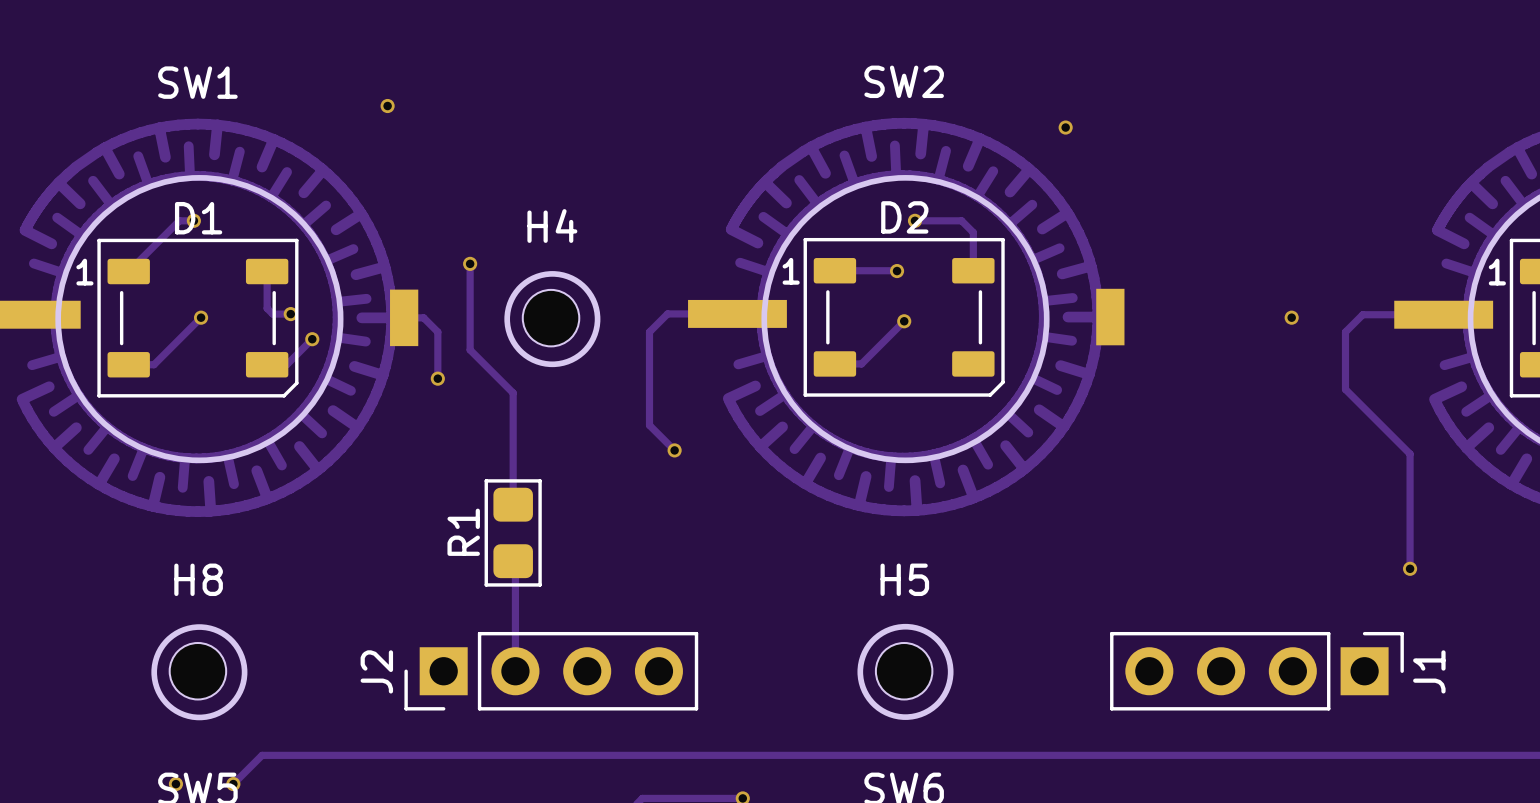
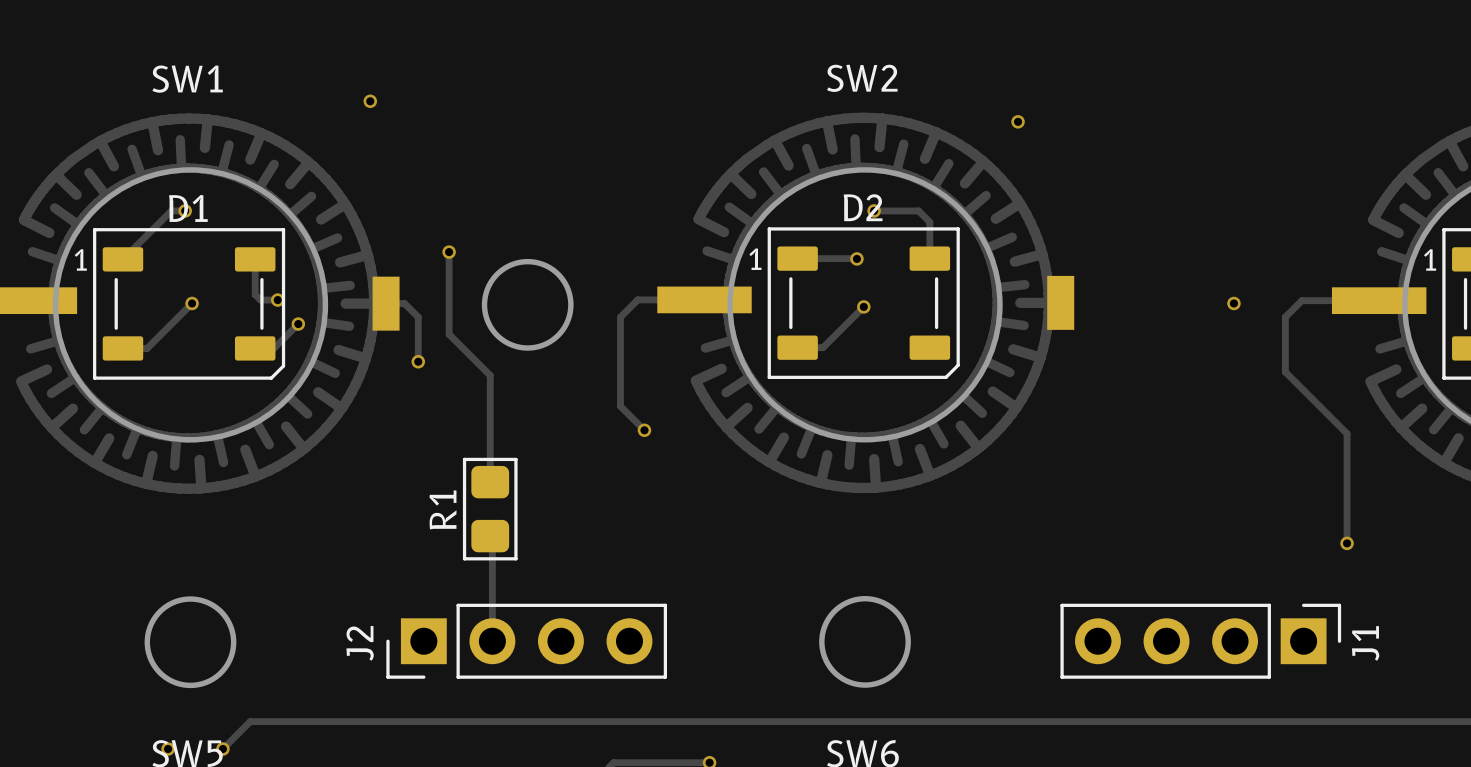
H4: (551, 318) -> none
H8: (197, 671) -> none
H5: (904, 671) -> none

